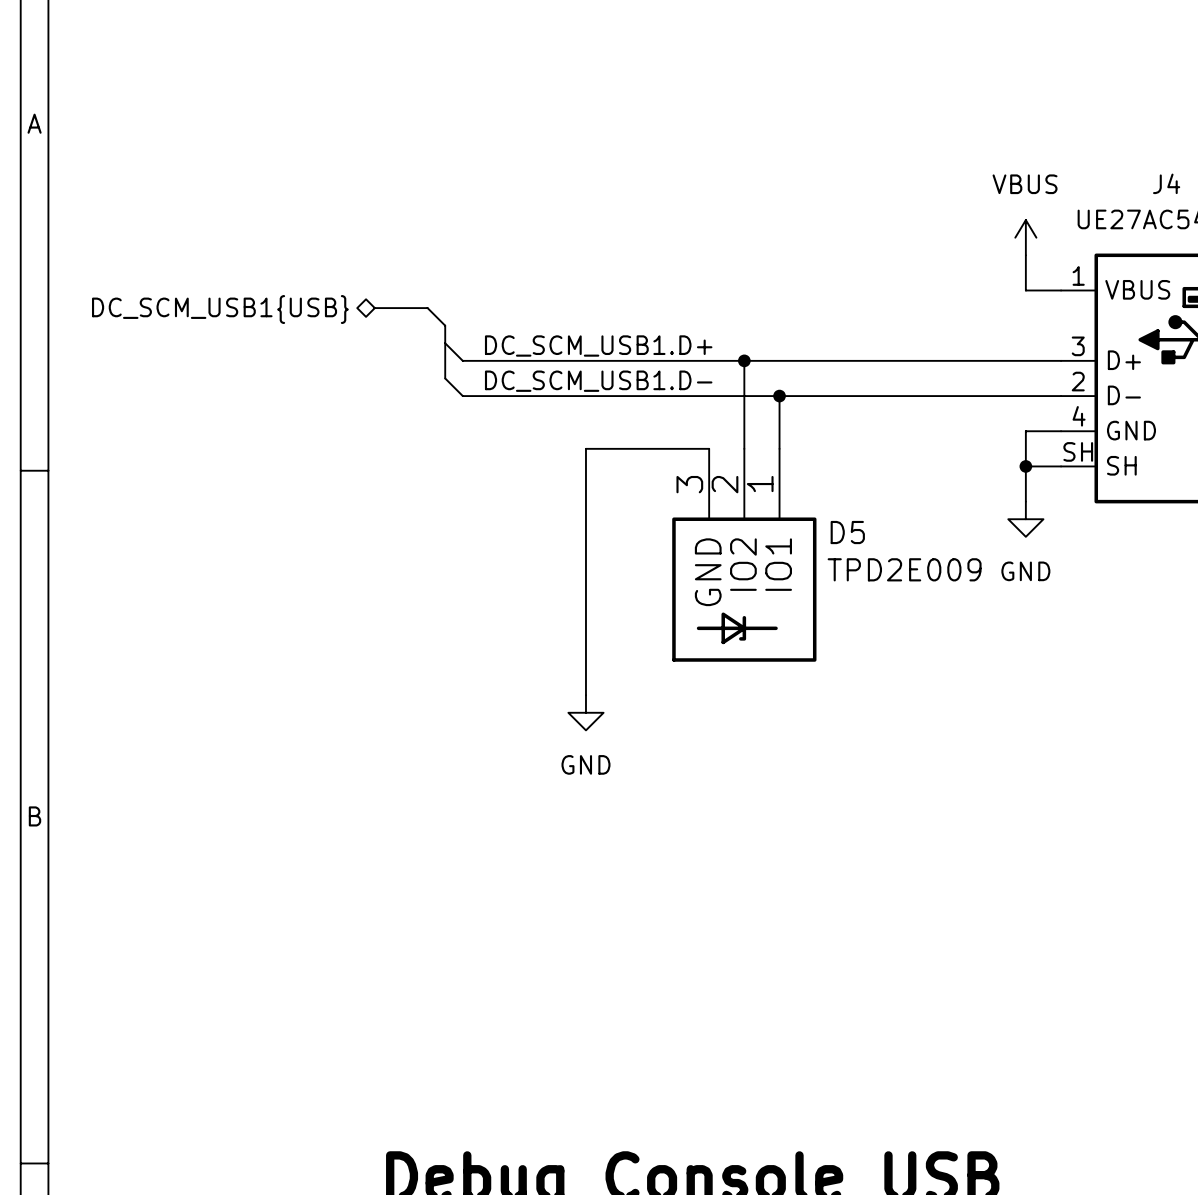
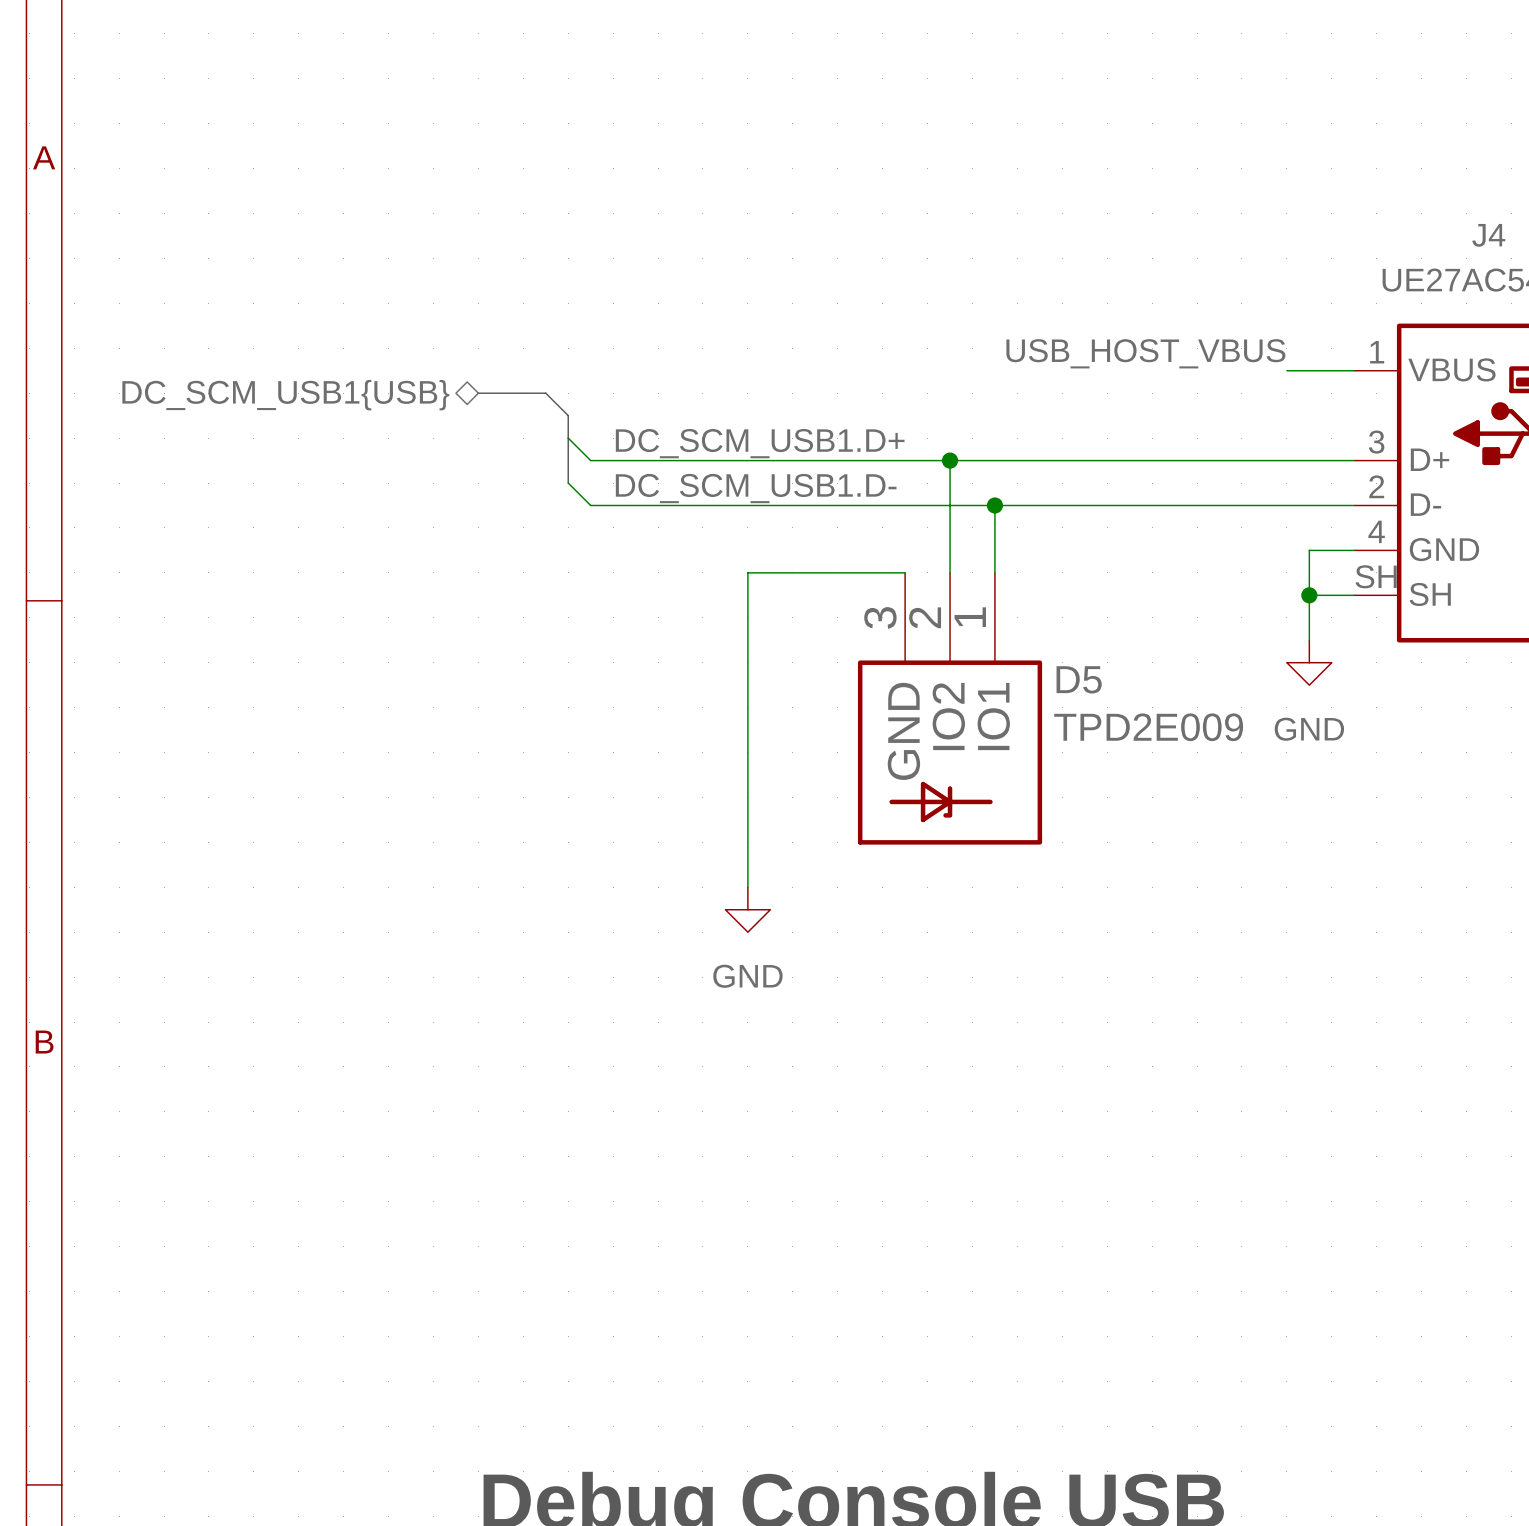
power symbol: VBUS (1025, 237) -> none
wire: (1025, 255) (1025, 290) -> (1286, 370) (1309, 370)
label: none -> USB_HOST_VBUS (1145, 353)

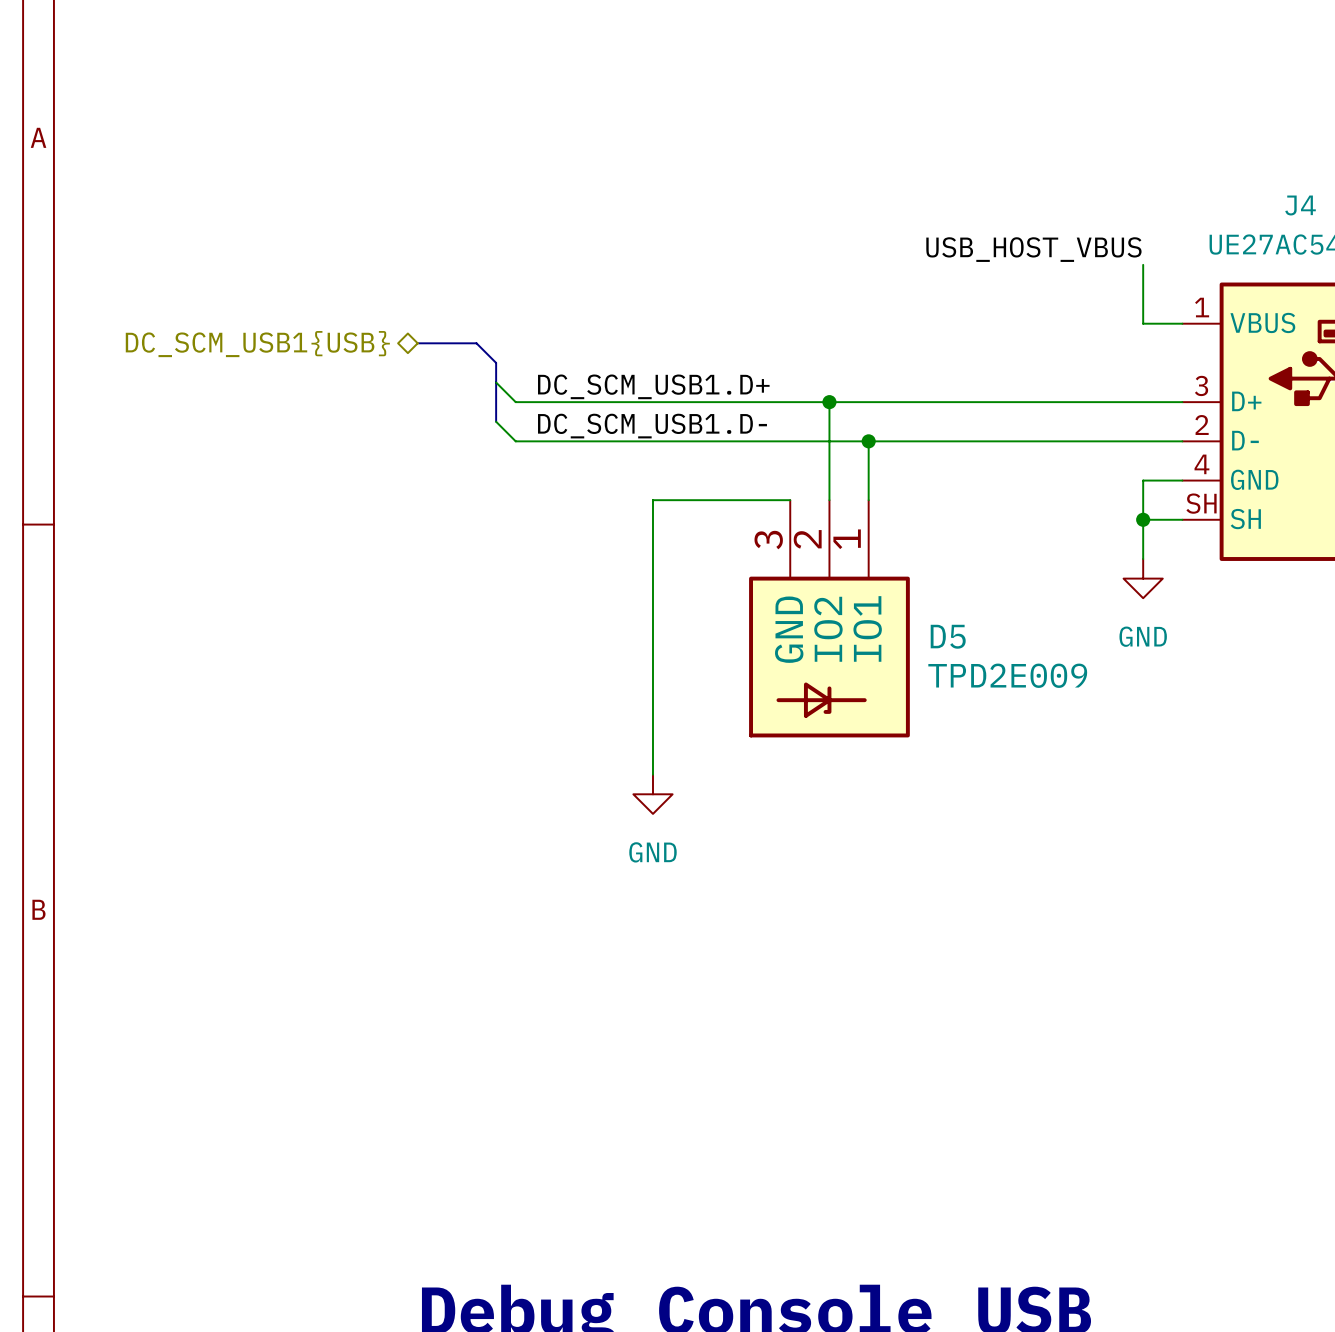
label position: USB_HOST_VBUS (1145, 353) -> USB_HOST_VBUS (1033, 249)
wire: (1286, 370) (1309, 370) -> (1143, 264) (1143, 323)
D5 name position: D5 (1079, 679) -> D5 (948, 636)
D5 value position: TPD2E009 (1148, 727) -> TPD2E009 (1007, 675)

